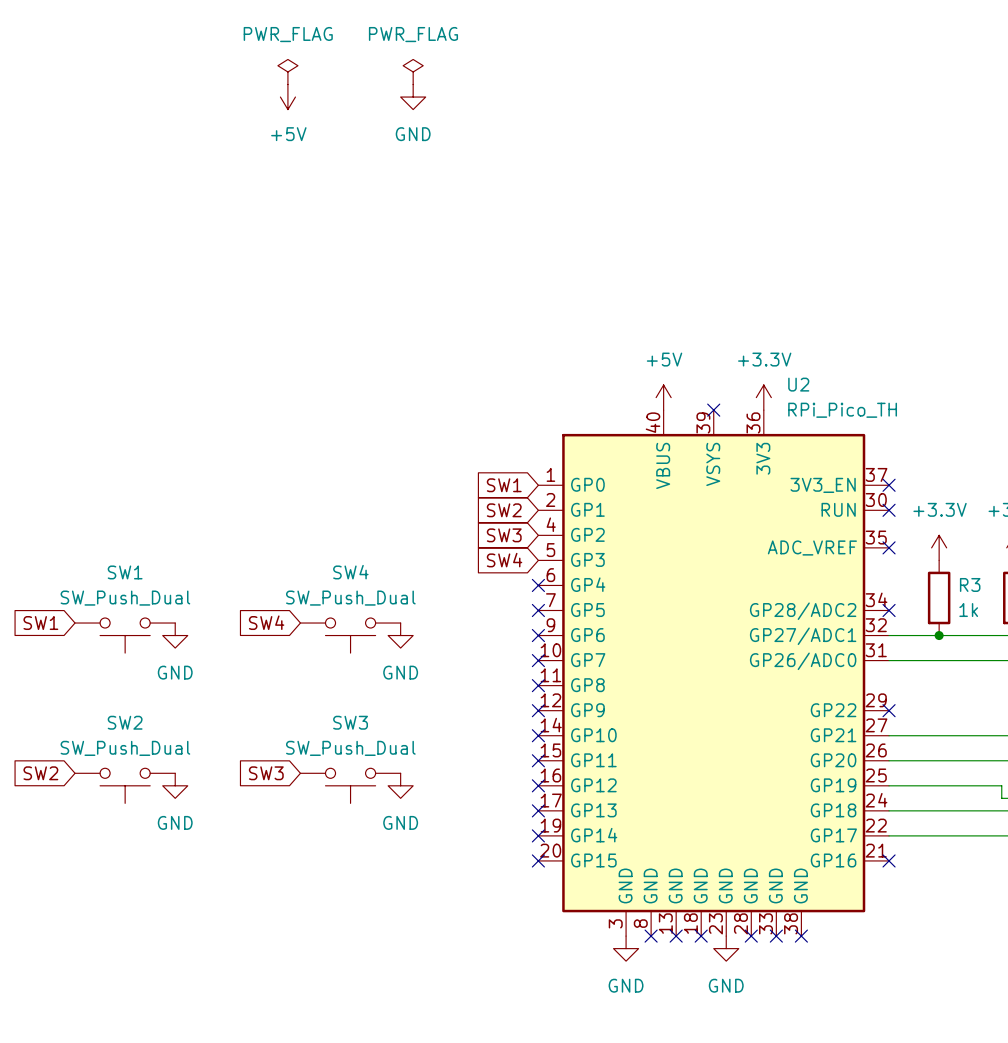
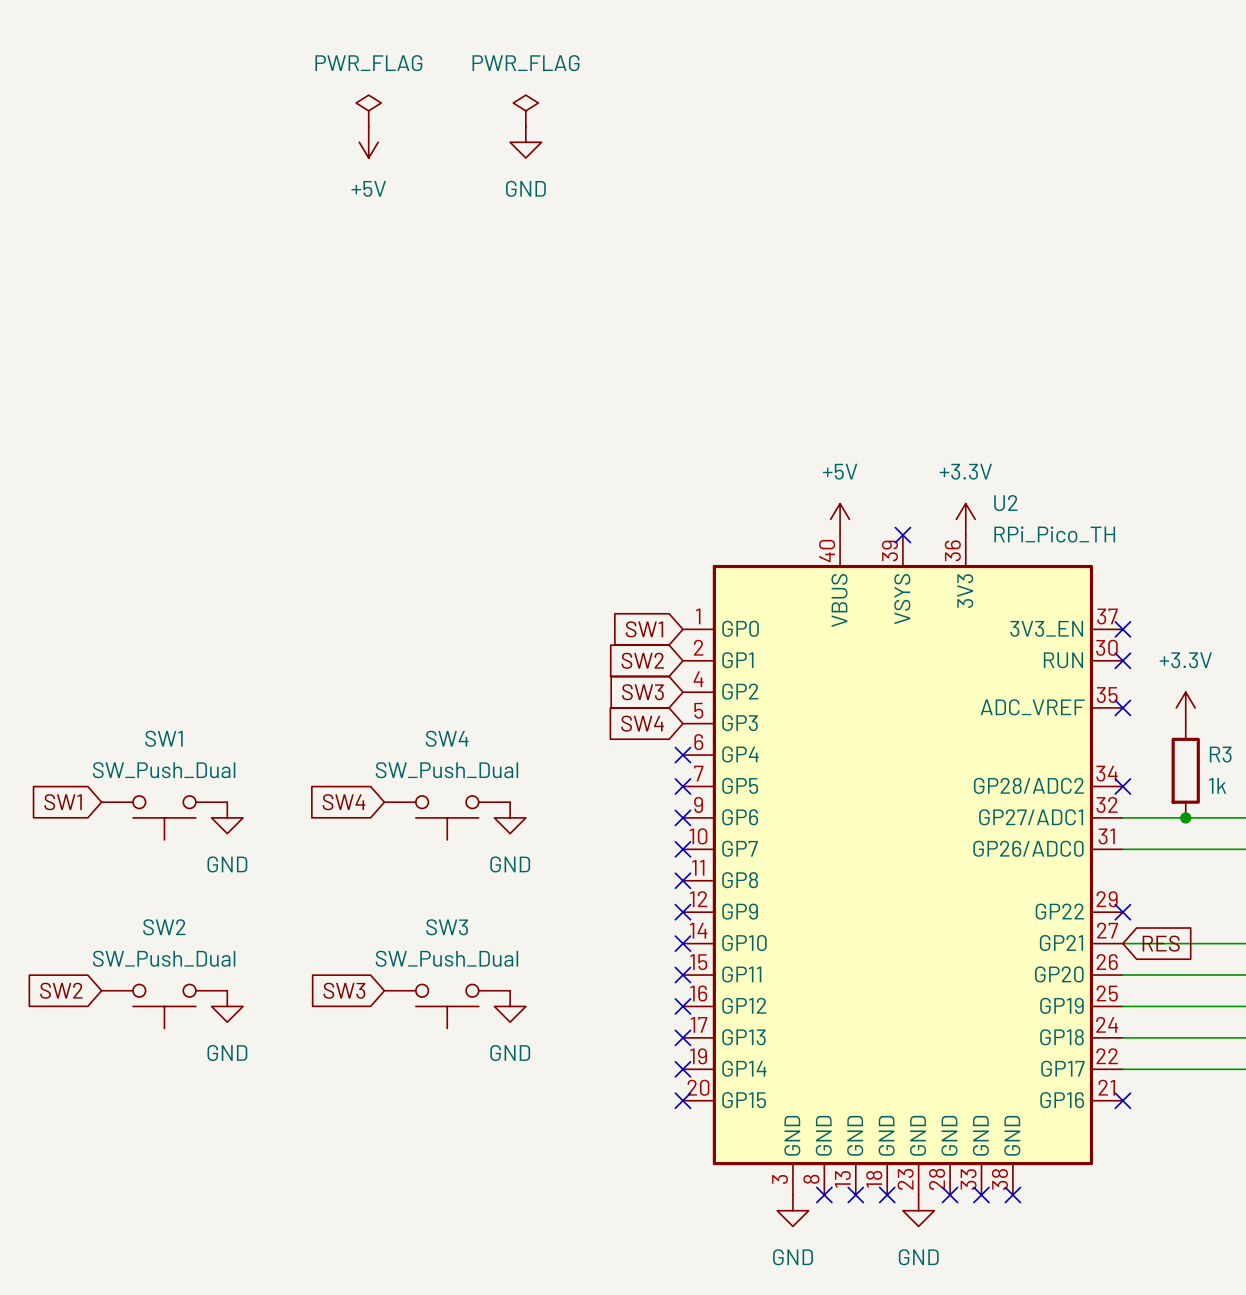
global label: none -> RES (1161, 943)

